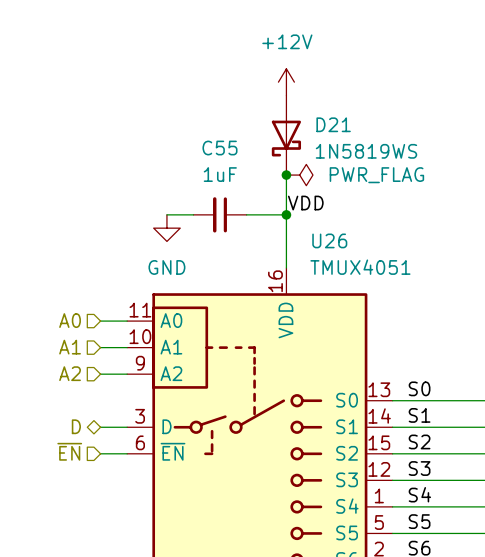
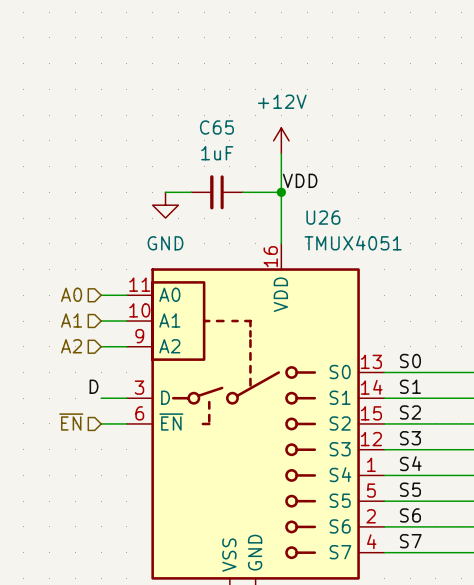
power symbol position: +12V (286, 82) -> +12V (281, 140)
D21: 1N5819WS (286, 135) -> none
C55 name: C55 (219, 148) -> C65 (216, 127)
junction: (286, 175) -> none
power symbol: PWR_FLAG (299, 175) -> none
label: none -> D (94, 386)
hierarchical label: D (76, 426) -> none

